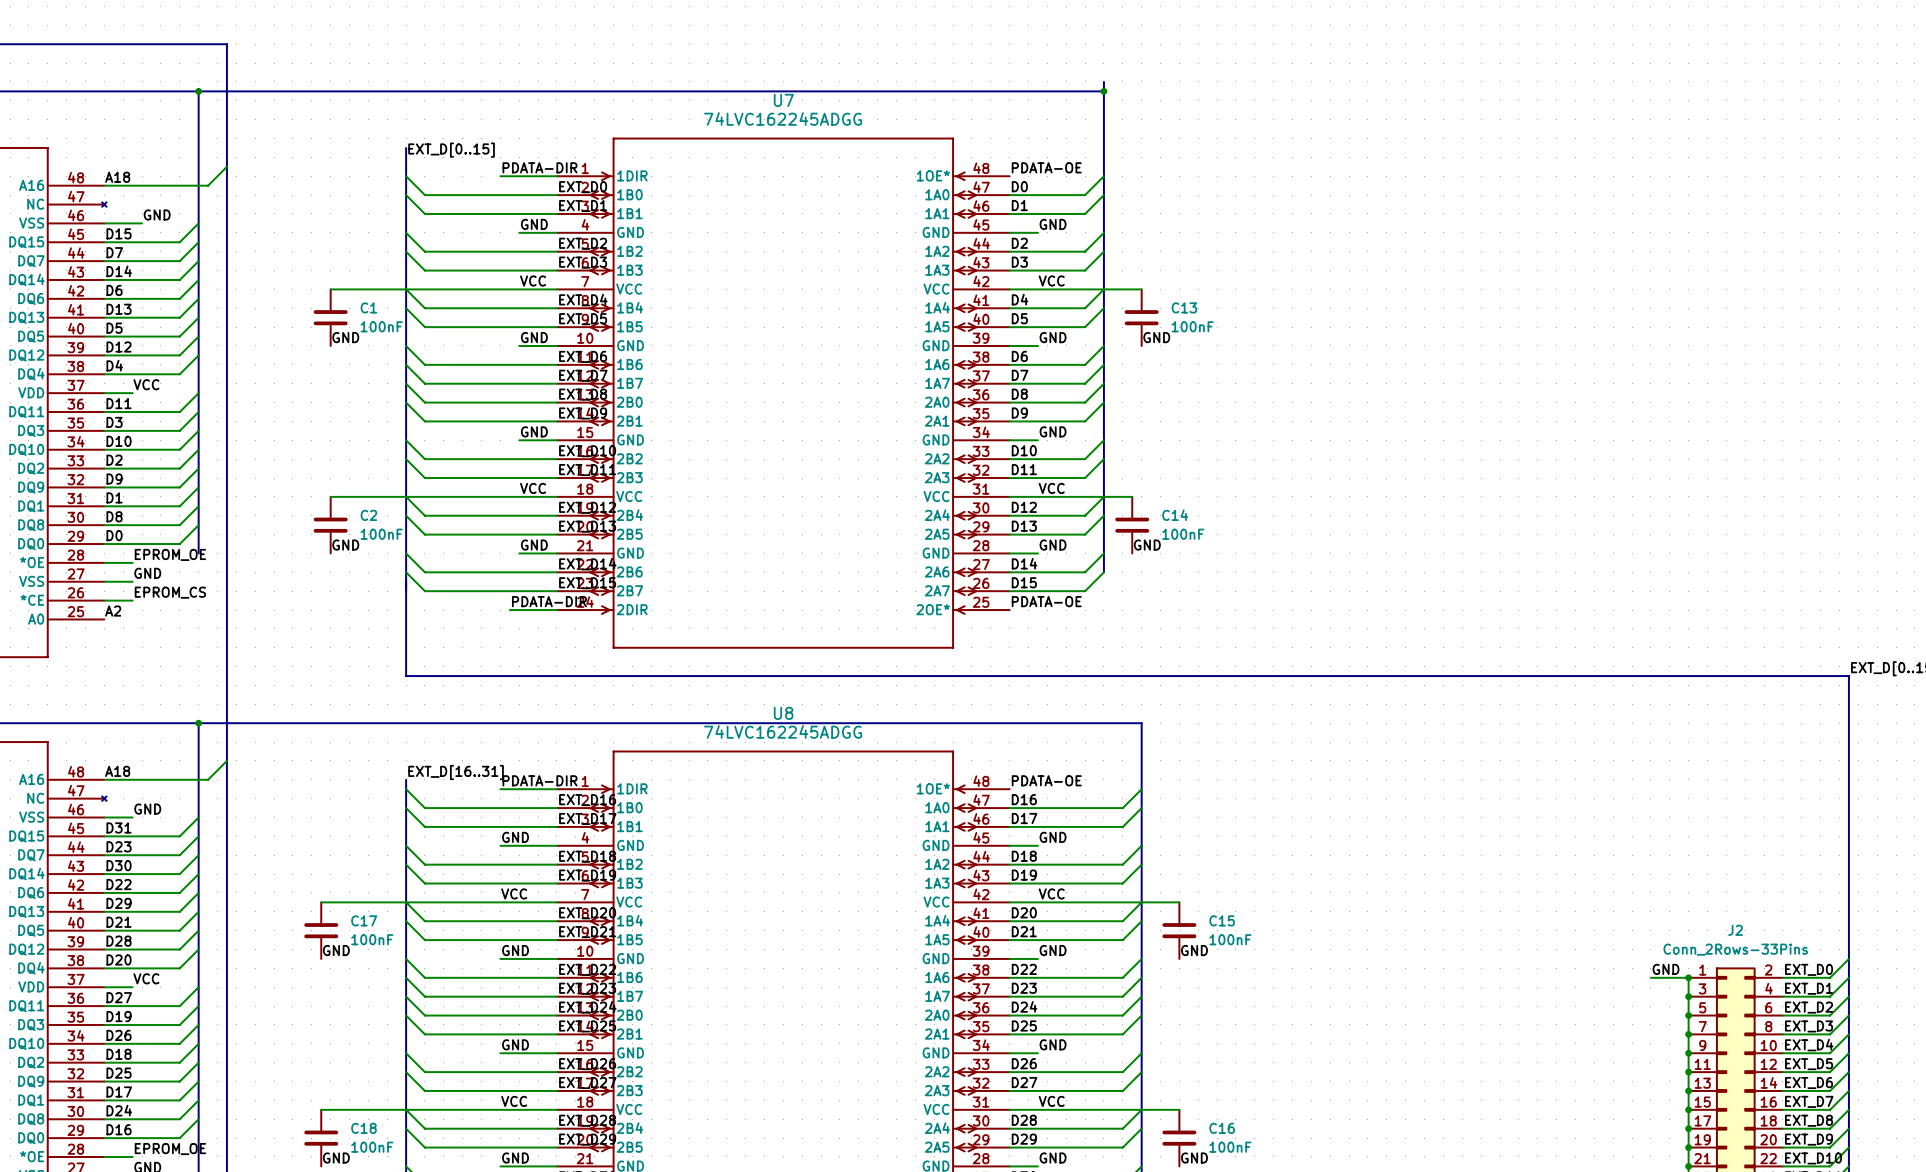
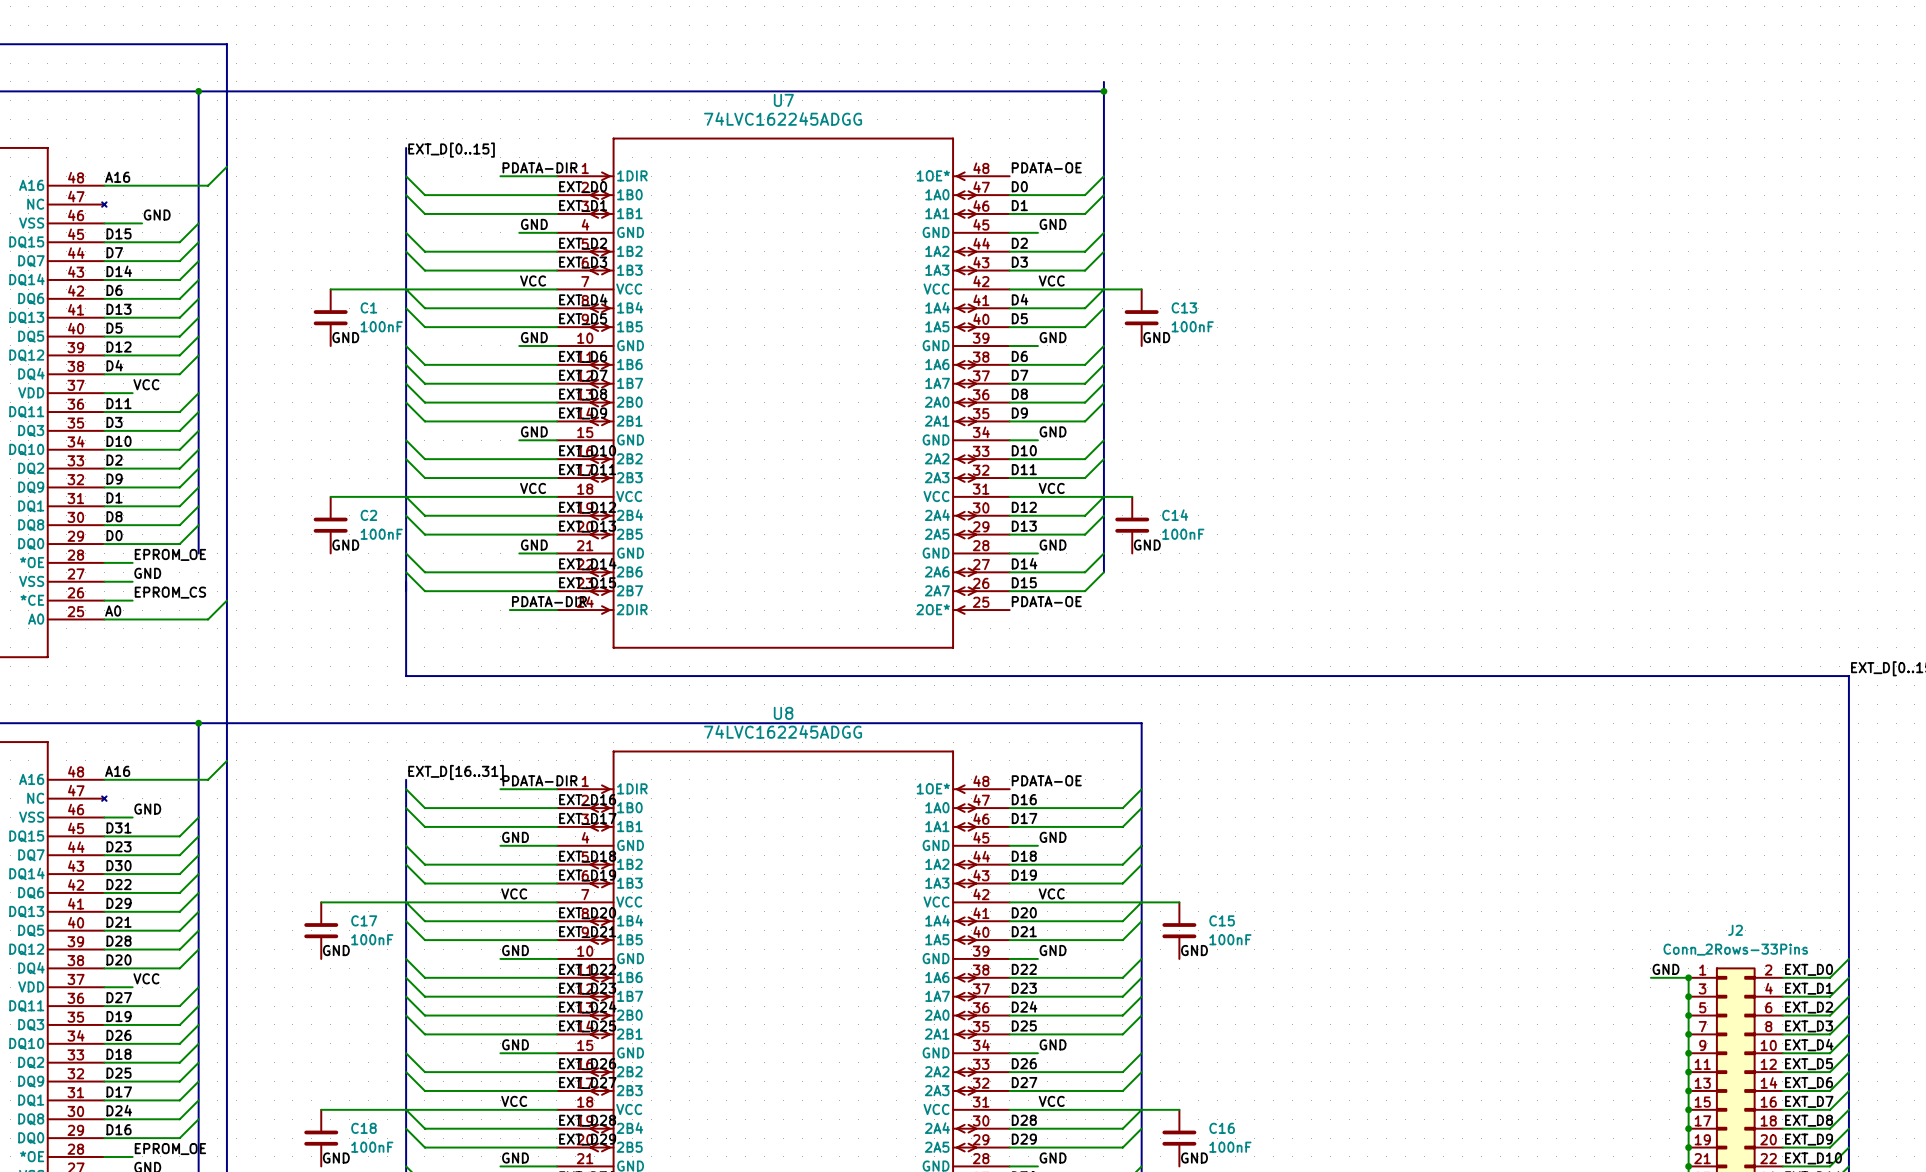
label: A18 (117, 177) -> A16 (117, 177)
wire: none -> (226, 600) (208, 619) (104, 619)
label: A2 (113, 611) -> A0 (113, 611)
label: A18 (117, 771) -> A16 (117, 771)

